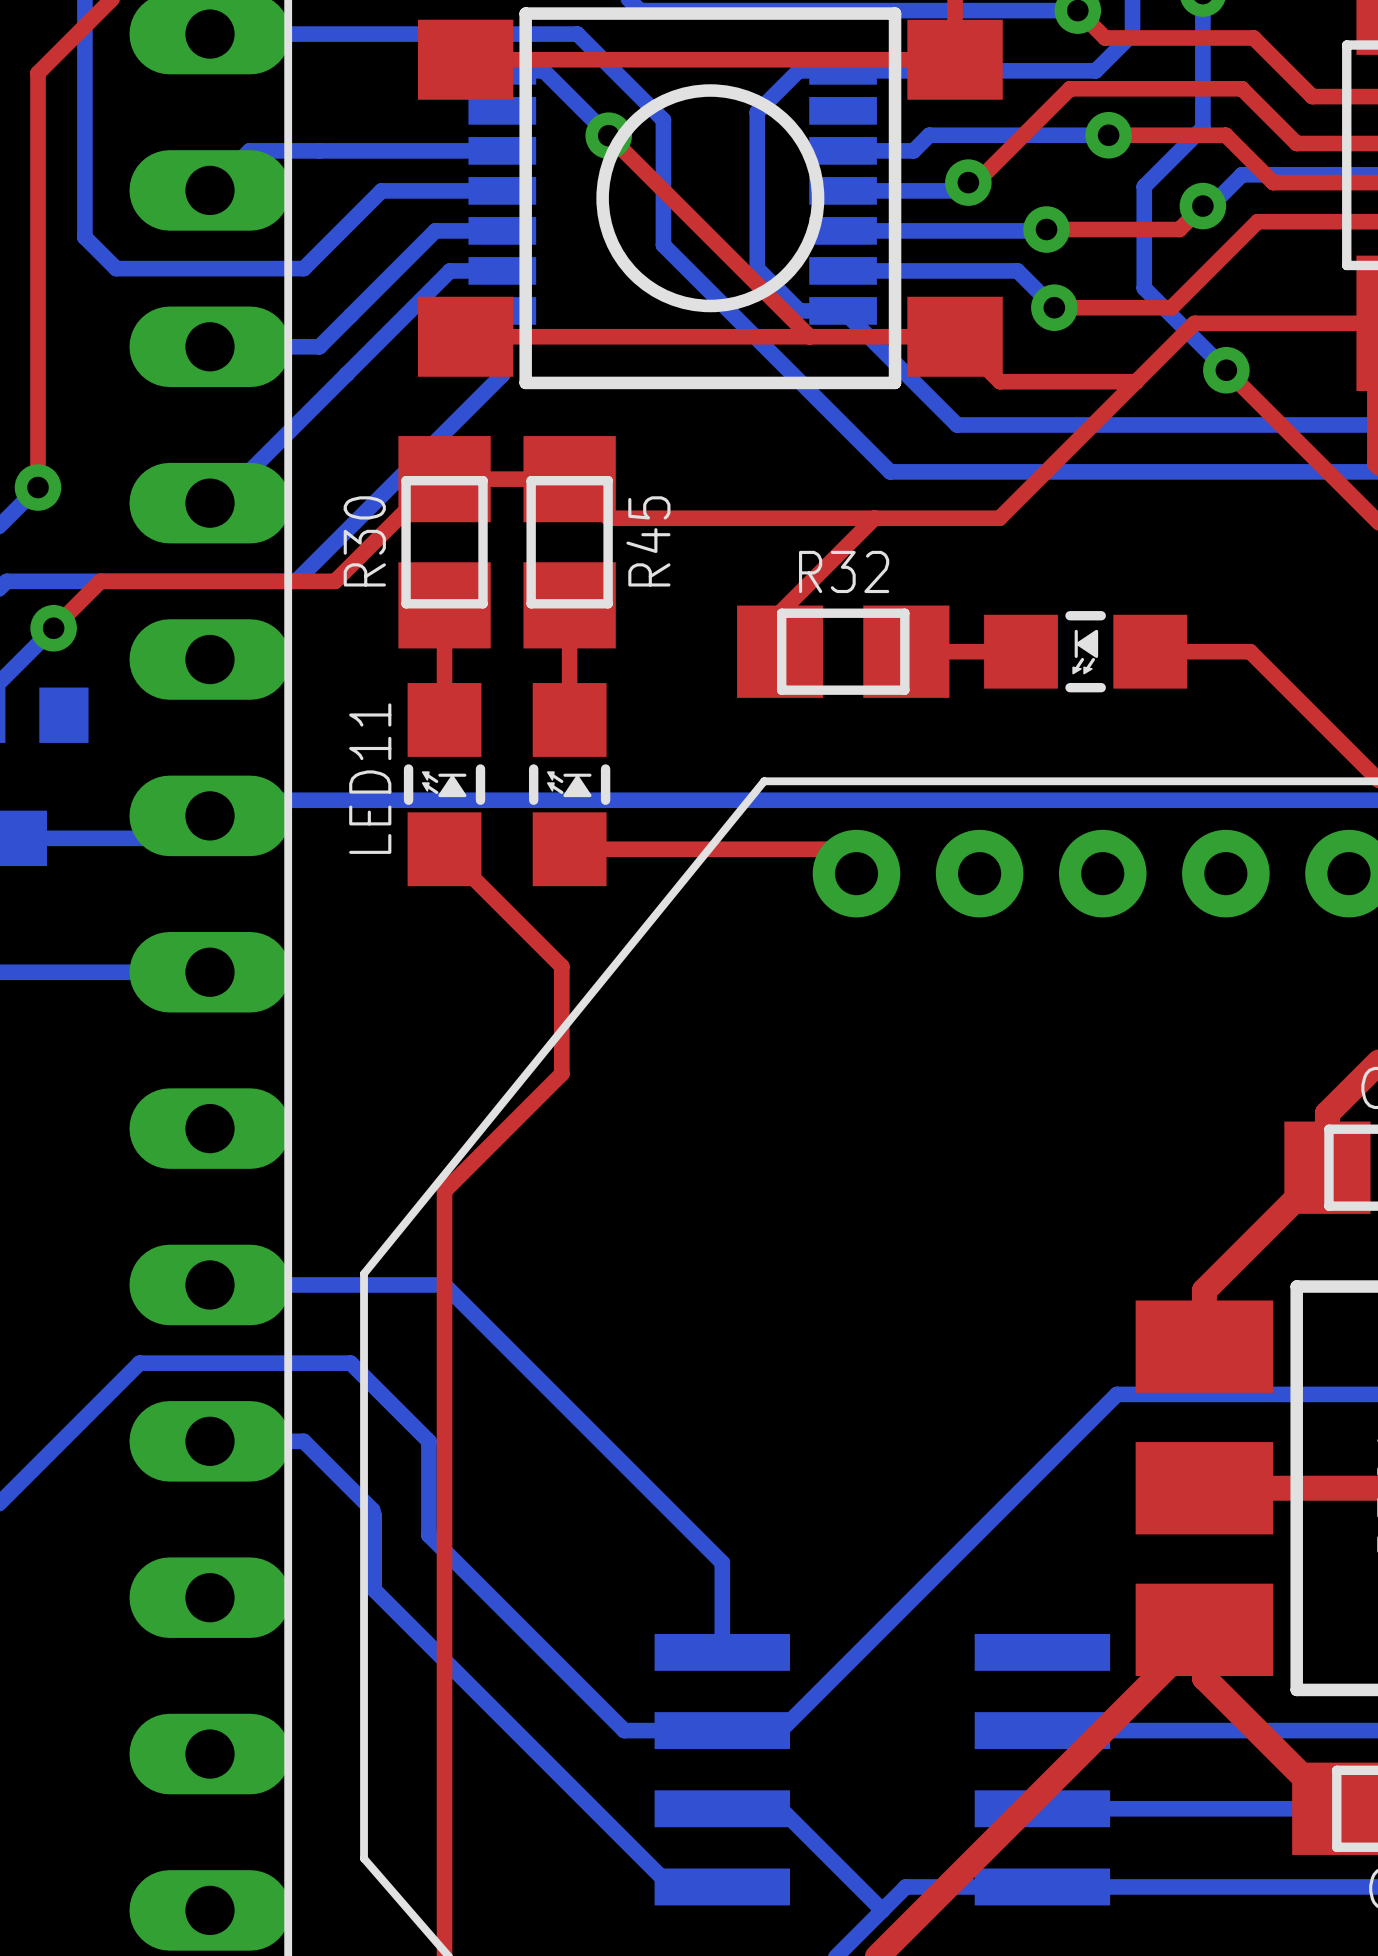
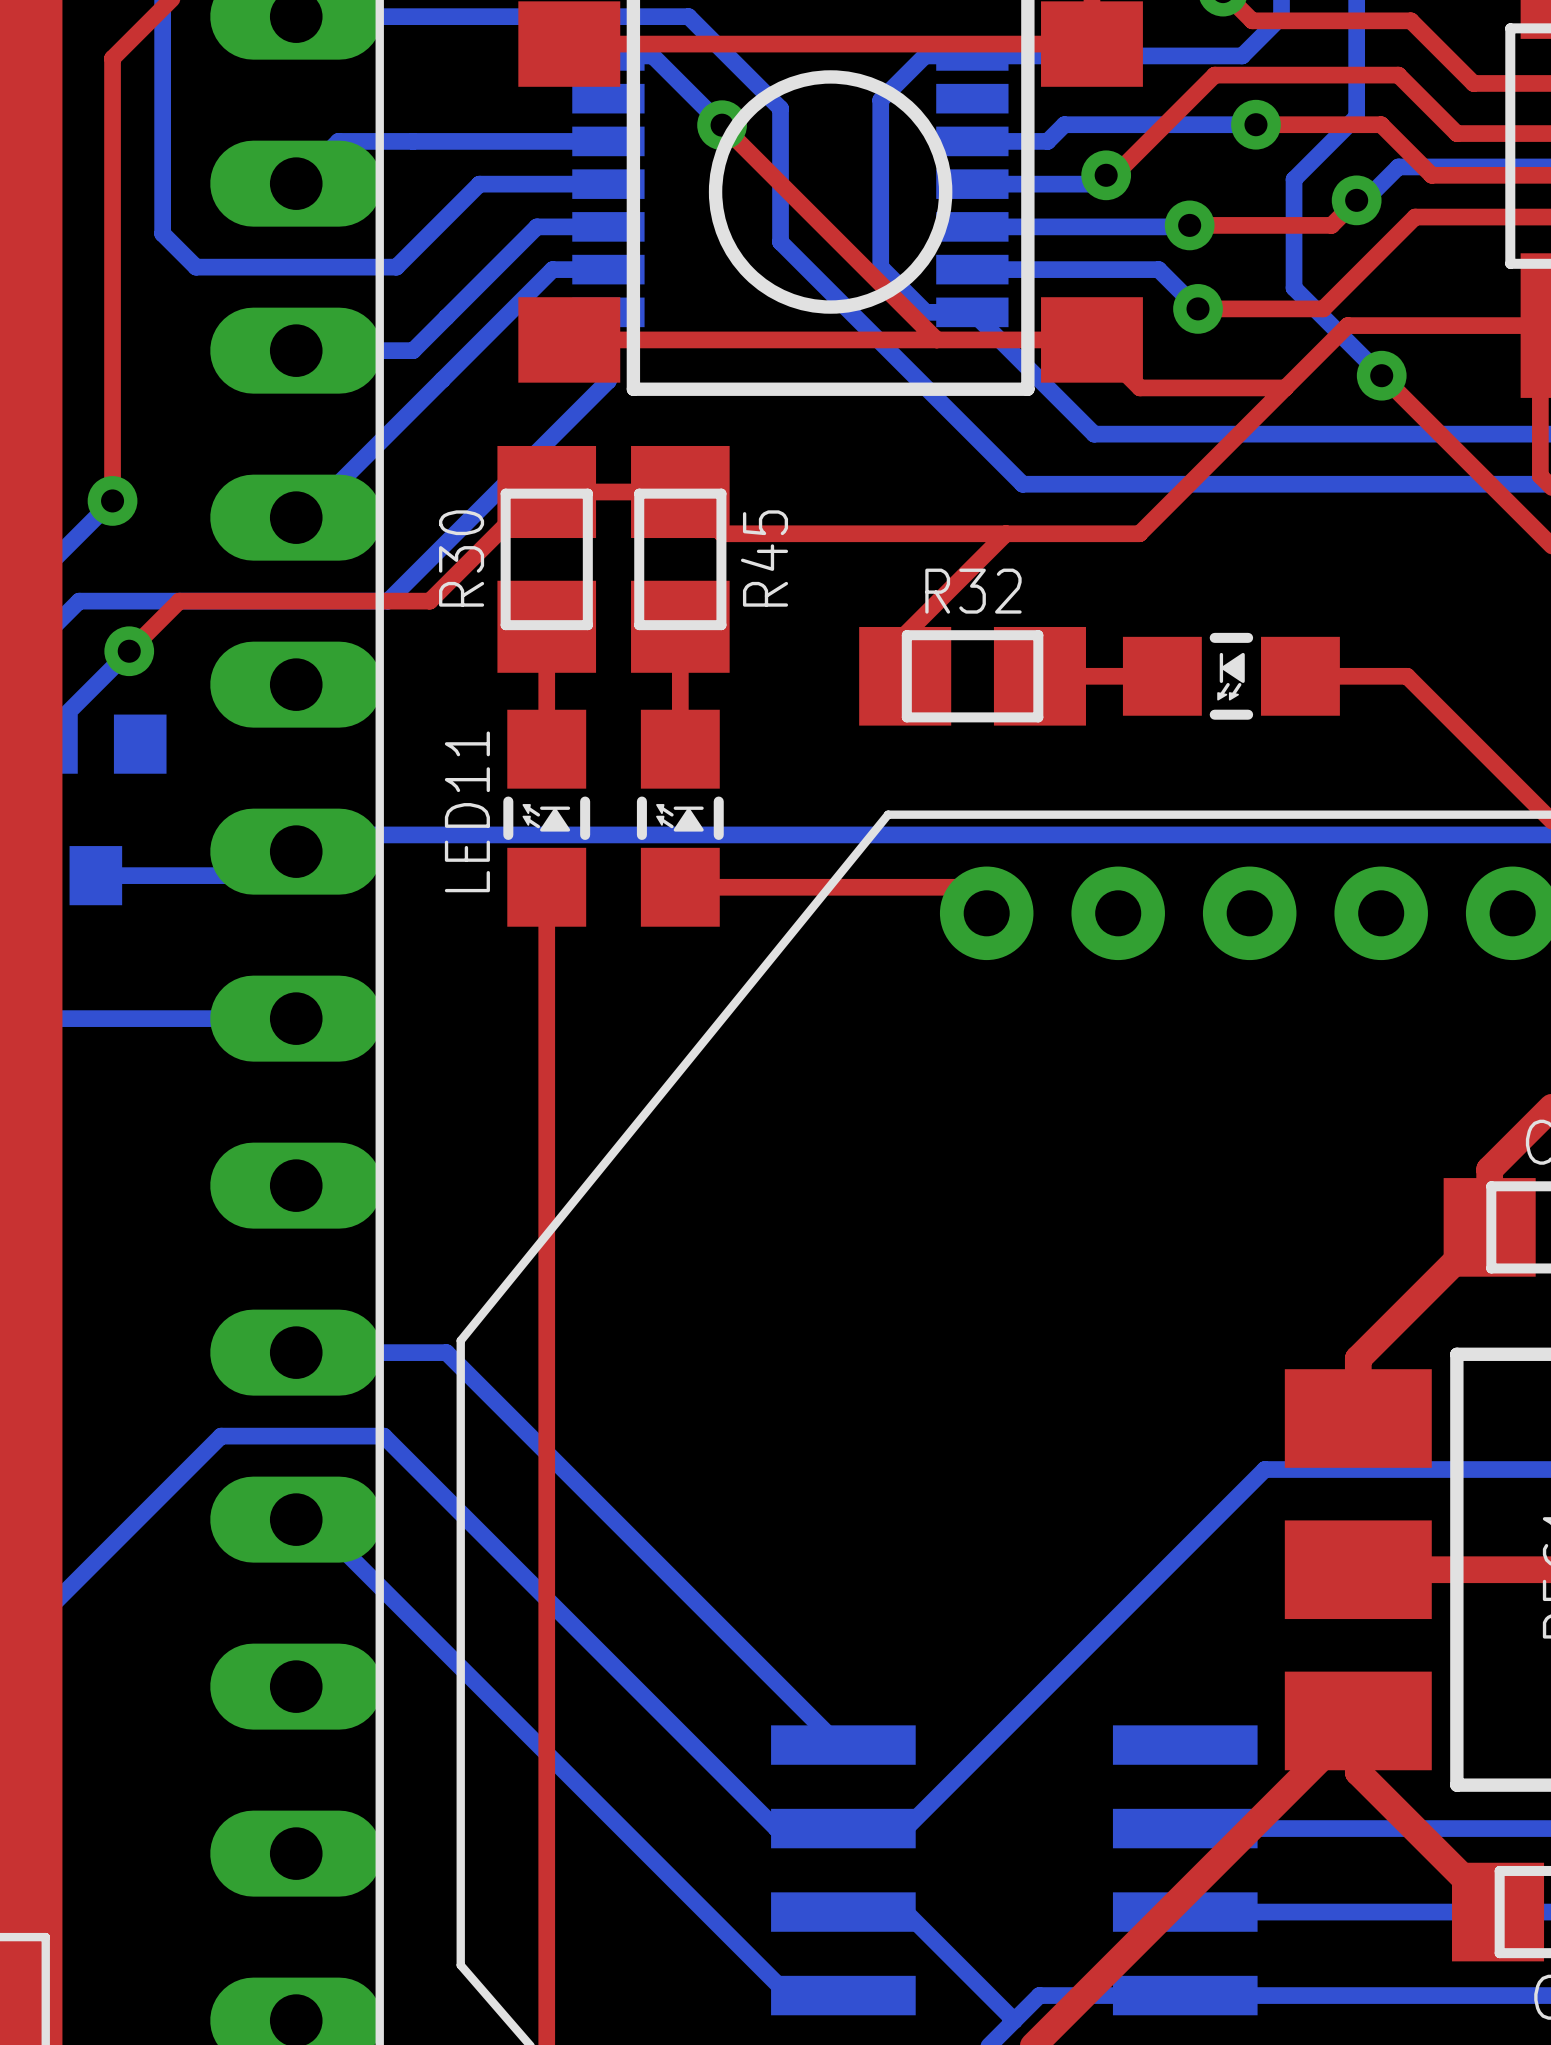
top track: (444, 849) (561, 966) (561, 1073) (444, 1191) -> (546, 887) (546, 1252)
bottom track: (350, 1284) (444, 1284) (722, 1562) (722, 1652) -> (446, 1352) (838, 1745) (843, 1745)
bottom track: (292, 1363) (350, 1363) (428, 1441) (428, 1535) (624, 1730) (659, 1730) -> (383, 1436) (776, 1828)
bottom track: (225, 1441) (303, 1441) (372, 1510) (374, 1589) -> (312, 1519) (471, 1678)

